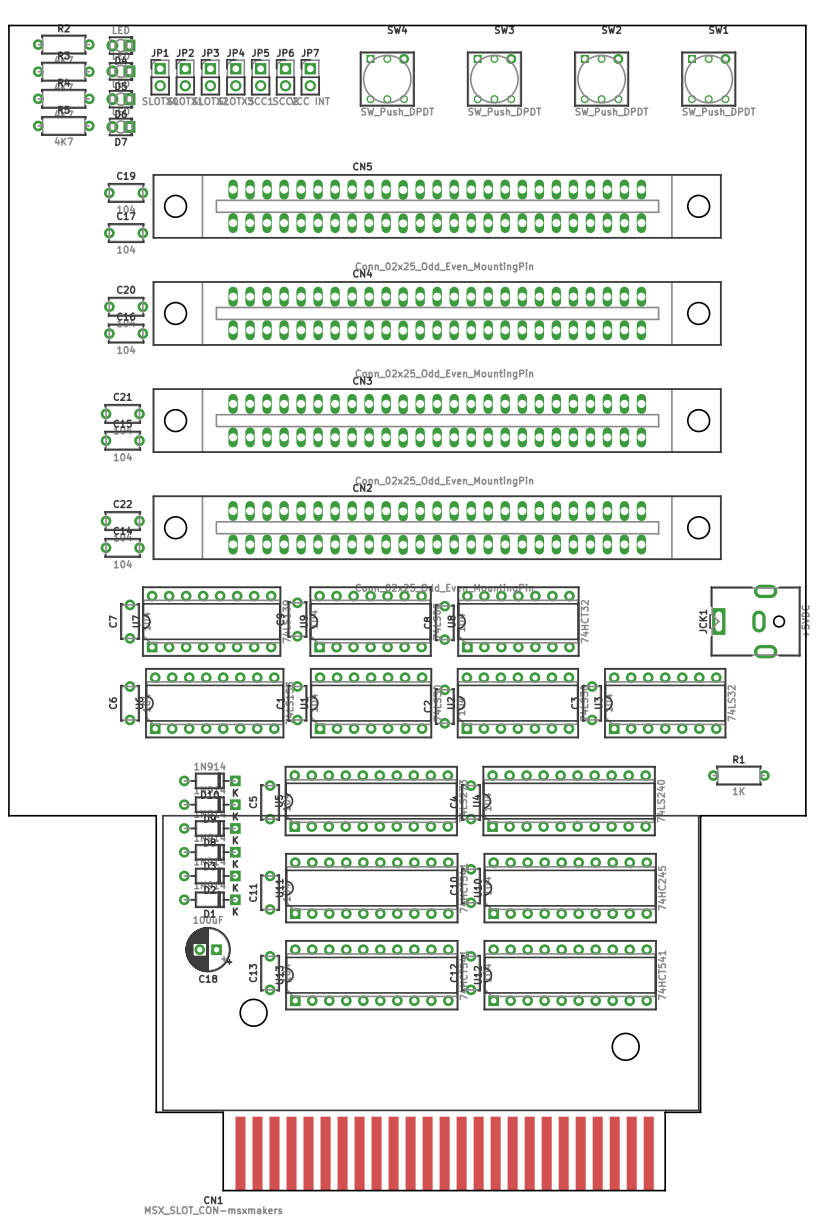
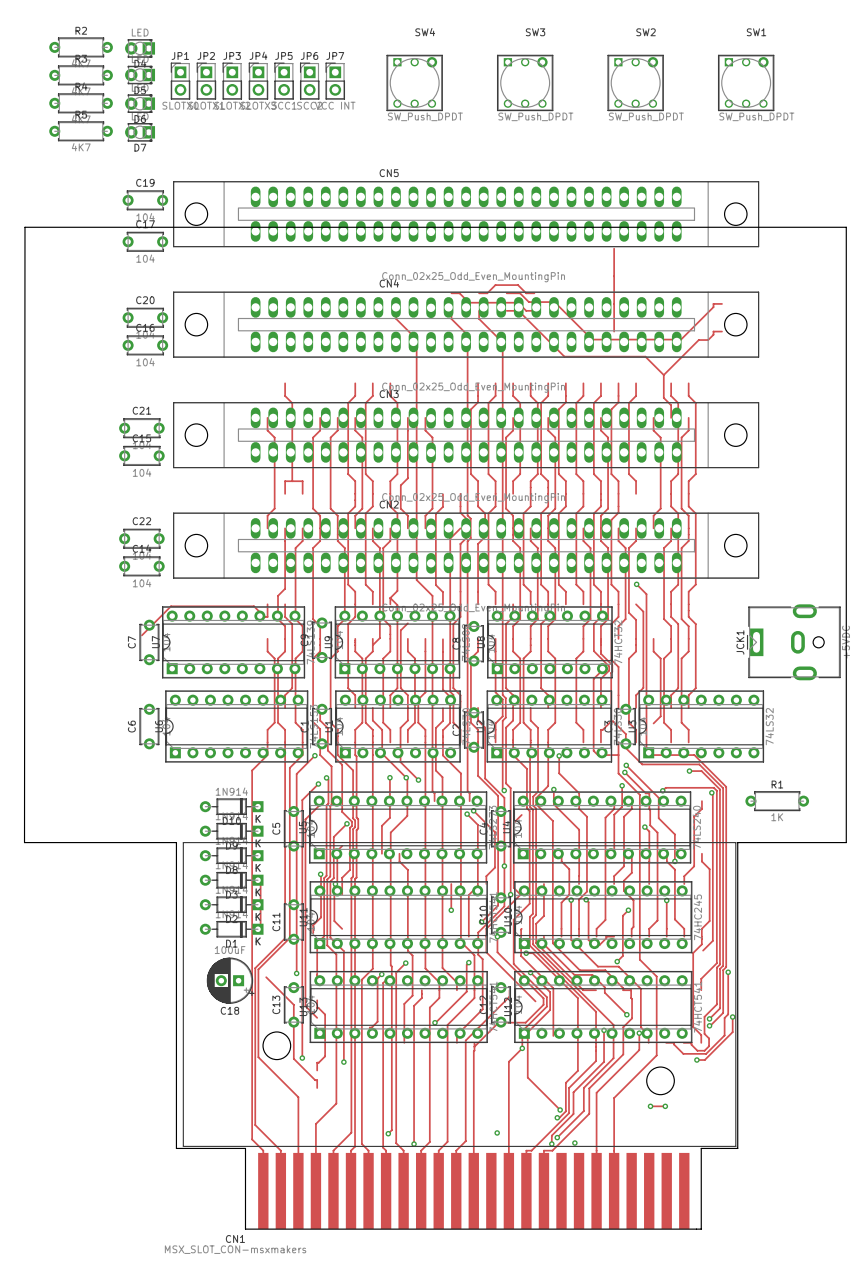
board edge: (805, 219) (805, 25) (8, 25) (8, 815) -> (846, 227) (24, 227) (24, 842)
track: none -> (614, 248) (614, 331)
track: none -> (451, 293) (459, 293) (469, 302) (518, 302) (526, 310) (534, 310)
track: none -> (479, 293) (487, 293) (495, 285) (518, 285) (526, 293) (534, 293)
track: none -> (506, 293) (520, 293) (528, 302) (554, 302) (592, 339) (681, 339) (713, 307) (713, 303) (721, 303)
track: none -> (396, 310) (396, 318) (416, 339) (416, 580) (432, 595) (432, 791) (434, 793) (434, 801)
track: none -> (451, 310) (451, 318) (467, 335) (467, 515) (470, 518) (470, 538) (467, 541) (467, 791) (469, 793) (469, 801)
track: none -> (479, 310) (479, 318) (502, 342) (502, 695) (505, 698) (505, 717) (502, 720) (502, 789) (504, 790)
track: none -> (506, 310) (518, 310) (564, 356) (645, 356) (663, 375)
track: none -> (721, 331) (713, 331) (713, 334) (708, 340) (698, 340) (663, 375)
track: none -> (663, 375) (663, 397) (671, 405) (671, 417)
track: none -> (285, 383) (285, 395) (292, 403) (292, 481)
track: none -> (355, 383) (355, 395) (348, 403) (348, 474) (355, 481) (355, 506) (348, 513) (348, 584) (355, 591) (355, 616) (348, 624) (348, 688) (355, 695) (355, 707)
track: none -> (372, 383) (372, 395) (365, 403) (365, 474) (372, 481) (372, 506) (365, 513) (365, 584) (372, 591) (372, 604)
track: none -> (390, 383) (390, 395) (397, 403) (397, 474) (390, 481) (390, 506) (397, 513) (397, 590) (390, 598)
track: none -> (478, 383) (478, 402) (470, 409) (470, 474) (478, 481) (478, 506) (485, 513) (485, 536) (478, 543)
track: none -> (495, 383) (495, 395) (488, 403) (488, 474) (495, 481) (495, 506) (488, 513) (488, 584) (495, 591) (495, 604)
track: none -> (513, 383) (513, 395) (520, 403) (520, 474) (513, 481) (513, 493)
track: none -> (530, 383) (530, 395) (537, 403) (537, 474) (530, 481) (530, 506) (523, 513) (523, 584) (530, 591) (530, 604)
track: none -> (548, 383) (548, 395) (541, 403) (541, 474) (548, 481) (548, 506) (541, 513) (541, 584) (548, 591) (548, 616) (541, 624) (541, 688) (548, 695) (548, 707)
track: none -> (565, 383) (565, 402) (558, 409) (558, 474) (565, 481) (565, 506) (558, 513) (558, 584) (565, 591) (565, 604)
track: none -> (583, 383) (583, 395) (576, 403) (576, 474) (583, 481) (583, 506) (576, 513) (576, 584) (583, 591) (583, 604)
track: none -> (600, 383) (600, 395) (593, 403) (593, 474) (600, 481) (600, 506) (593, 513) (593, 584) (600, 591) (600, 616) (593, 624) (593, 651) (609, 666) (609, 670) (600, 678) (600, 707)
track: none -> (618, 383) (618, 402)
track: none -> (636, 383) (636, 395) (628, 403) (628, 474) (636, 481) (636, 493)
track: none -> (671, 383) (671, 395) (678, 403) (678, 474) (671, 481) (671, 506) (678, 513) (678, 584) (671, 591) (671, 616) (678, 624) (678, 688) (671, 695) (671, 707)
track: none -> (688, 383) (688, 395) (695, 403) (695, 474) (688, 481) (688, 506) (695, 513) (695, 584) (688, 591) (688, 616) (695, 624) (695, 688) (688, 695) (688, 707)
track: none -> (618, 402) (611, 409) (611, 474) (618, 481) (618, 512)
track: none -> (267, 417) (267, 430) (274, 437) (274, 508) (267, 515) (267, 528)
track: none -> (320, 417) (320, 430) (313, 437) (313, 508) (320, 515) (320, 540) (313, 548) (313, 619) (320, 626) (320, 651) (313, 658) (313, 722) (320, 729) (320, 755) (331, 766) (330, 876) (327, 879) (327, 945) (336, 954) (336, 1103) (315, 1123) (315, 1190)
track: none -> (337, 417) (337, 430) (330, 437) (330, 508) (337, 515) (337, 540) (344, 548) (344, 619) (337, 626) (337, 651) (330, 658) (330, 722) (337, 729) (337, 755) (353, 770) (353, 818) (355, 820) (355, 827) (353, 829) (353, 876) (351, 878) (351, 1132) (333, 1150) (333, 1190)
track: none -> (355, 417) (355, 430) (362, 437) (362, 508) (355, 515) (355, 528)
track: none -> (407, 417) (407, 478)
track: none -> (425, 417) (425, 430) (432, 437) (432, 508) (425, 515) (425, 528)
track: none -> (513, 417) (513, 430) (506, 437) (506, 508) (513, 515) (513, 540) (520, 548) (520, 619) (513, 626) (513, 651) (520, 658) (520, 722) (513, 729) (513, 755) (526, 768) (526, 808) (529, 810) (529, 903) (513, 919) (513, 964) (546, 997) (546, 1006) (522, 1031) (522, 1048) (508, 1061) (508, 1190)
track: none -> (548, 417) (548, 430) (555, 437) (555, 508) (548, 515) (548, 540) (555, 548) (555, 619) (548, 626) (548, 651) (555, 658) (555, 722) (548, 729) (548, 786) (536, 797) (536, 804) (552, 820) (552, 943) (579, 970) (605, 970) (623, 990) (631, 990) (632, 1018) (623, 1027) (623, 1054) (589, 1088) (589, 1113) (552, 1150) (543, 1150) (543, 1190)
track: none -> (600, 417) (600, 430) (608, 437) (608, 508) (600, 515) (600, 540) (608, 548) (608, 619) (600, 626) (600, 653) (612, 665) (611, 721)
track: none -> (653, 417) (653, 430) (660, 437) (660, 508) (653, 515) (653, 528)
track: none -> (688, 417) (688, 430) (681, 437) (681, 508) (688, 515) (688, 540) (681, 548) (681, 619) (688, 626) (688, 651) (681, 658) (681, 722) (688, 729) (688, 742)
track: none -> (407, 478) (400, 485) (400, 508) (407, 515) (407, 528)
track: none -> (285, 493) (285, 481) (302, 481) (302, 493)
track: none -> (442, 494) (442, 506) (435, 513) (435, 585) (442, 592) (442, 604)
track: none -> (460, 493) (460, 512) (467, 519) (467, 536) (460, 543) (460, 616) (453, 624) (453, 688) (460, 695) (460, 707)
track: none -> (618, 512) (611, 519) (611, 584) (618, 591) (618, 616) (611, 624) (611, 659) (618, 666) (618, 707)
track: none -> (285, 528) (285, 588) (278, 595) (278, 619) (285, 626) (285, 651) (278, 658) (278, 722) (285, 729) (285, 938) (255, 968) (255, 1125) (280, 1150) (280, 1190)
track: none -> (302, 528) (302, 540) (295, 548) (295, 619) (302, 626) (302, 651) (295, 658) (295, 722) (302, 729) (302, 755) (289, 767) (289, 938) (258, 969) (258, 1057) (298, 1097) (298, 1190)
track: none -> (372, 528) (372, 540) (379, 548) (379, 638) (372, 645)
track: none -> (390, 528) (390, 540) (383, 548) (383, 619) (390, 626) (390, 651) (383, 658) (383, 722) (390, 729) (390, 742)
track: none -> (460, 528) (450, 538) (450, 691) (453, 694) (453, 722) (460, 729) (460, 742)
track: none -> (530, 528) (530, 540) (537, 548) (537, 619) (530, 626) (530, 651) (523, 658) (523, 722) (530, 729) (530, 806) (532, 809) (532, 913) (529, 916) (529, 945) (596, 1011) (596, 1061) (568, 1088) (568, 1113) (531, 1150) (526, 1150) (526, 1190)
track: none -> (583, 528) (583, 540) (590, 548) (590, 619) (583, 626) (583, 651) (576, 658) (576, 722) (583, 729) (583, 742)
track: none -> (618, 528) (618, 540) (625, 548) (625, 619) (618, 626) (618, 638)
track: none -> (636, 528) (636, 540) (628, 548) (628, 612) (636, 619)
track: none -> (671, 528) (671, 540) (664, 548) (664, 619) (671, 626) (671, 651) (664, 658) (664, 722) (671, 729) (671, 742)
track: none -> (478, 543) (478, 604)
track: none -> (636, 584) (646, 594) (646, 751) (650, 755) (694, 755) (726, 786) (726, 967) (723, 970) (723, 1012) (709, 1025)
via: none -> (636, 584)
track: none -> (390, 598) (390, 604)
track: none -> (390, 598) (397, 605) (397, 688) (390, 695) (390, 707)
track: none -> (267, 604) (267, 616) (264, 616) (253, 606) (171, 606) (141, 635)
track: none -> (285, 604) (285, 616) (292, 624) (292, 688) (285, 695) (285, 707)
track: none -> (513, 604) (513, 616) (506, 624) (506, 688) (513, 695) (513, 720) (506, 727) (506, 783) (510, 788) (510, 894)
track: none -> (636, 604) (643, 611) (643, 687) (636, 695) (636, 707)
track: none -> (636, 619) (636, 651) (628, 658) (628, 722) (636, 729) (636, 742)
track: none -> (407, 623) (400, 630) (400, 688) (407, 695) (407, 720) (400, 727) (400, 762) (418, 780)
track: none -> (267, 638) (267, 651) (274, 658) (274, 722) (267, 729) (267, 755) (252, 770) (252, 1139) (263, 1150) (263, 1190)
track: none -> (355, 638) (355, 651) (362, 658) (362, 722) (355, 729) (358, 828) (356, 830) (356, 877) (355, 879) (355, 1146) (351, 1150) (351, 1190)
track: none -> (372, 638) (372, 651) (365, 658) (365, 722) (372, 729) (372, 968) (361, 979) (361, 1144) (368, 1150) (368, 1190)
track: none -> (407, 638) (407, 651) (414, 658) (414, 722) (407, 729) (407, 742)
track: none -> (425, 638) (425, 692)
track: none -> (442, 639) (442, 689) (450, 696) (450, 723) (442, 730) (442, 755) (460, 773) (460, 941) (474, 955) (474, 998) (447, 1024) (447, 1141) (438, 1150) (438, 1190)
track: none -> (478, 638) (478, 651) (470, 658) (470, 722) (478, 729) (478, 775) (498, 795) (498, 905) (481, 922)
track: none -> (495, 638) (495, 692) (502, 699) (502, 716) (495, 723) (495, 742)
track: none -> (653, 638) (653, 651) (660, 658) (660, 716) (653, 723)
track: none -> (604, 668) (593, 678) (593, 750) (597, 755) (618, 755)
track: none -> (425, 692) (418, 699) (418, 722) (425, 729) (425, 968) (439, 982) (439, 998) (429, 1007) (429, 1142) (421, 1150) (421, 1190)
track: none -> (320, 707) (320, 720) (327, 728) (327, 750) (342, 764) (342, 811) (352, 821) (349, 827) (349, 869) (342, 877) (342, 894)
track: none -> (372, 707) (372, 720) (382, 729) (382, 753) (407, 778) (407, 815) (390, 832) (391, 1130) (388, 1133)
track: none -> (442, 708) (442, 720) (435, 728) (435, 770) (442, 777) (442, 968) (456, 982) (456, 990)
track: none -> (478, 707) (478, 720) (485, 727) (485, 778) (504, 797) (504, 906) (478, 932) (478, 954) (482, 959) (482, 1009) (456, 1035) (456, 1042)
track: none -> (530, 707) (530, 720) (538, 727) (538, 791) (533, 796) (533, 805) (536, 808) (536, 915) (533, 918) (533, 944) (613, 1024) (613, 1058) (583, 1087) (583, 1111) (557, 1137)
track: none -> (611, 721) (625, 734) (625, 748) (642, 764) (699, 764) (723, 788) (723, 965) (720, 968) (720, 1008) (709, 1018)
track: none -> (611, 721) (600, 729) (600, 742)
track: none -> (618, 742) (618, 773) (639, 794) (639, 959) (656, 976) (656, 1055) (614, 1098) (614, 1190)
track: none -> (314, 755) (296, 773) (296, 973)
via: none -> (314, 755)
track: none -> (559, 755) (559, 773) (579, 793) (579, 808) (586, 816) (586, 891) (579, 899) (579, 936)
via: none -> (559, 755)
track: none -> (626, 765) (658, 797) (658, 818) (674, 834) (674, 861)
via: none -> (626, 765)
track: none -> (689, 771) (701, 771) (719, 789) (719, 964) (716, 967) (716, 1004) (704, 1016) (704, 1033) (709, 1038) (709, 1046) (704, 1050) (697, 1050) (691, 1042) (683, 1042)
via: none -> (689, 771)
track: none -> (624, 772) (645, 793) (649, 793) (650, 825) (657, 832) (657, 920) (649, 928) (649, 936)
via: none -> (624, 772)
track: none -> (326, 777) (328, 779) (328, 803) (326, 805) (326, 875) (324, 878) (324, 936) (317, 943) (317, 982)
via: none -> (326, 777)
track: none -> (389, 777) (389, 817) (381, 825) (381, 853)
via: none -> (389, 777)
via: none -> (406, 777)
via: none -> (418, 780)
track: none -> (318, 784) (302, 800) (302, 1058)
via: none -> (318, 784)
track: none -> (622, 785) (622, 806) (614, 814) (614, 853)
via: none -> (622, 785)
track: none -> (553, 789) (553, 804) (579, 829) (579, 884)
via: none -> (553, 789)
via: none -> (504, 790)
track: none -> (662, 790) (665, 787) (713, 787) (716, 790) (716, 963) (701, 978) (701, 990)
via: none -> (662, 790)
track: none -> (711, 792) (712, 940) (703, 950)
via: none -> (711, 792)
track: none -> (323, 801) (305, 819) (305, 1006) (317, 1017)
track: none -> (614, 801) (614, 808) (605, 817) (605, 919) (596, 928) (596, 936)
track: none -> (631, 801) (631, 808) (624, 816) (624, 866) (614, 876) (614, 884)
track: none -> (701, 801) (701, 808) (694, 816) (694, 866) (684, 876) (684, 884)
track: none -> (473, 810) (494, 832) (494, 867) (486, 876) (486, 884)
via: none -> (473, 810)
track: none -> (467, 814) (477, 824) (477, 885) (468, 895) (468, 936)
via: none -> (467, 814)
track: none -> (521, 814) (513, 822) (513, 887) (520, 894)
track: none -> (346, 823) (333, 836) (333, 878) (330, 881) (330, 937) (343, 951) (343, 1062)
via: none -> (346, 823)
track: none -> (644, 827) (649, 831) (649, 884)
via: none -> (644, 827)
track: none -> (342, 846) (337, 850) (337, 882) (334, 885) (334, 921) (342, 928)
track: none -> (399, 853) (399, 861) (407, 869) (407, 950) (412, 955) (412, 995) (404, 1003) (404, 1042)
track: none -> (561, 853) (561, 861) (569, 869) (569, 894) (561, 902) (561, 936)
track: none -> (631, 853) (631, 872) (623, 880) (623, 890) (633, 900) (631, 936)
track: none -> (666, 853) (666, 861) (674, 869) (674, 919) (684, 928) (684, 936)
track: none -> (701, 853) (701, 861) (709, 869) (709, 921) (701, 928) (701, 944) (693, 953) (693, 1026) (701, 1035) (701, 1042)
via: none -> (674, 861)
via: none -> (504, 866)
track: none -> (320, 874) (321, 917) (313, 925) (313, 933)
via: none -> (320, 874)
track: none -> (260, 884) (260, 933)
via: none -> (335, 884)
track: none -> (451, 884) (451, 910)
track: none -> (543, 884) (543, 915) (536, 923) (536, 943) (583, 990) (596, 990)
track: none -> (520, 894) (486, 928) (486, 952) (535, 1001)
via: none -> (510, 894)
track: none -> (571, 900) (571, 939) (597, 966) (618, 966) (640, 988) (640, 1027) (648, 1035) (648, 1042)
via: none -> (571, 900)
track: none -> (586, 899) (588, 902) (588, 940) (593, 944) (599, 944) (606, 936) (614, 936)
via: none -> (586, 899)
track: none -> (666, 900) (666, 936)
via: none -> (666, 900)
via: none -> (451, 910)
track: none -> (628, 910) (622, 915) (622, 955) (617, 961)
via: none -> (628, 910)
via: none -> (481, 922)
track: none -> (521, 928) (521, 956) (553, 988) (553, 1035)
track: none -> (543, 936) (543, 944) (574, 974) (592, 974) (604, 987) (604, 992) (626, 1014)
track: none -> (497, 936) (497, 952) (543, 998) (543, 1004) (525, 1022) (498, 1022) (474, 1046)
via: none -> (497, 936)
track: none -> (526, 953) (532, 953) (577, 998) (577, 1070) (565, 1082) (565, 1111) (557, 1117)
via: none -> (526, 953)
via: none -> (617, 961)
track: none -> (405, 963) (396, 972) (396, 1143) (403, 1150) (403, 1190)
via: none -> (405, 963)
track: none -> (468, 962) (466, 964) (466, 991) (434, 1022)
via: none -> (468, 962)
track: none -> (530, 972) (550, 992) (550, 1010) (527, 1032) (527, 1077) (560, 1109)
via: none -> (530, 972)
track: none -> (728, 972) (728, 1014) (724, 1017) (724, 1035) (706, 1053) (683, 1053) (673, 1042) (666, 1042)
via: none -> (728, 972)
via: none -> (296, 973)
track: none -> (381, 974) (377, 978) (377, 1021) (369, 1027) (369, 1035)
via: none -> (381, 974)
track: none -> (266, 977) (293, 1004) (293, 1058) (317, 1080) (317, 1088)
track: none -> (386, 979) (383, 983) (383, 1147) (386, 1150) (386, 1190)
track: none -> (421, 990) (421, 998) (414, 1005) (414, 1144)
track: none -> (509, 990) (509, 996) (465, 1040) (465, 1141) (456, 1150) (456, 1190)
track: none -> (317, 1000) (317, 1008) (325, 1014) (325, 1056) (317, 1062) (317, 1070)
via: none -> (626, 1014)
track: none -> (732, 1017) (732, 1032) (704, 1060) (696, 1060)
via: none -> (732, 1017)
via: none -> (709, 1018)
via: none -> (434, 1022)
via: none -> (709, 1025)
track: none -> (604, 1030) (604, 1061) (573, 1092) (573, 1113) (551, 1135) (551, 1144)
via: none -> (604, 1030)
track: none -> (639, 1033) (639, 1050) (596, 1092) (596, 1190)
via: none -> (639, 1033)
track: none -> (474, 1042) (473, 1190)
via: none -> (522, 1048)
via: none -> (302, 1058)
via: none -> (696, 1060)
via: none -> (343, 1062)
track: none -> (650, 1106) (665, 1106)
via: none -> (650, 1106)
via: none -> (665, 1106)
via: none -> (560, 1109)
via: none -> (557, 1117)
via: none -> (497, 1132)
via: none -> (388, 1133)
via: none -> (557, 1137)
via: none -> (574, 1143)
via: none -> (414, 1144)
via: none -> (551, 1144)

